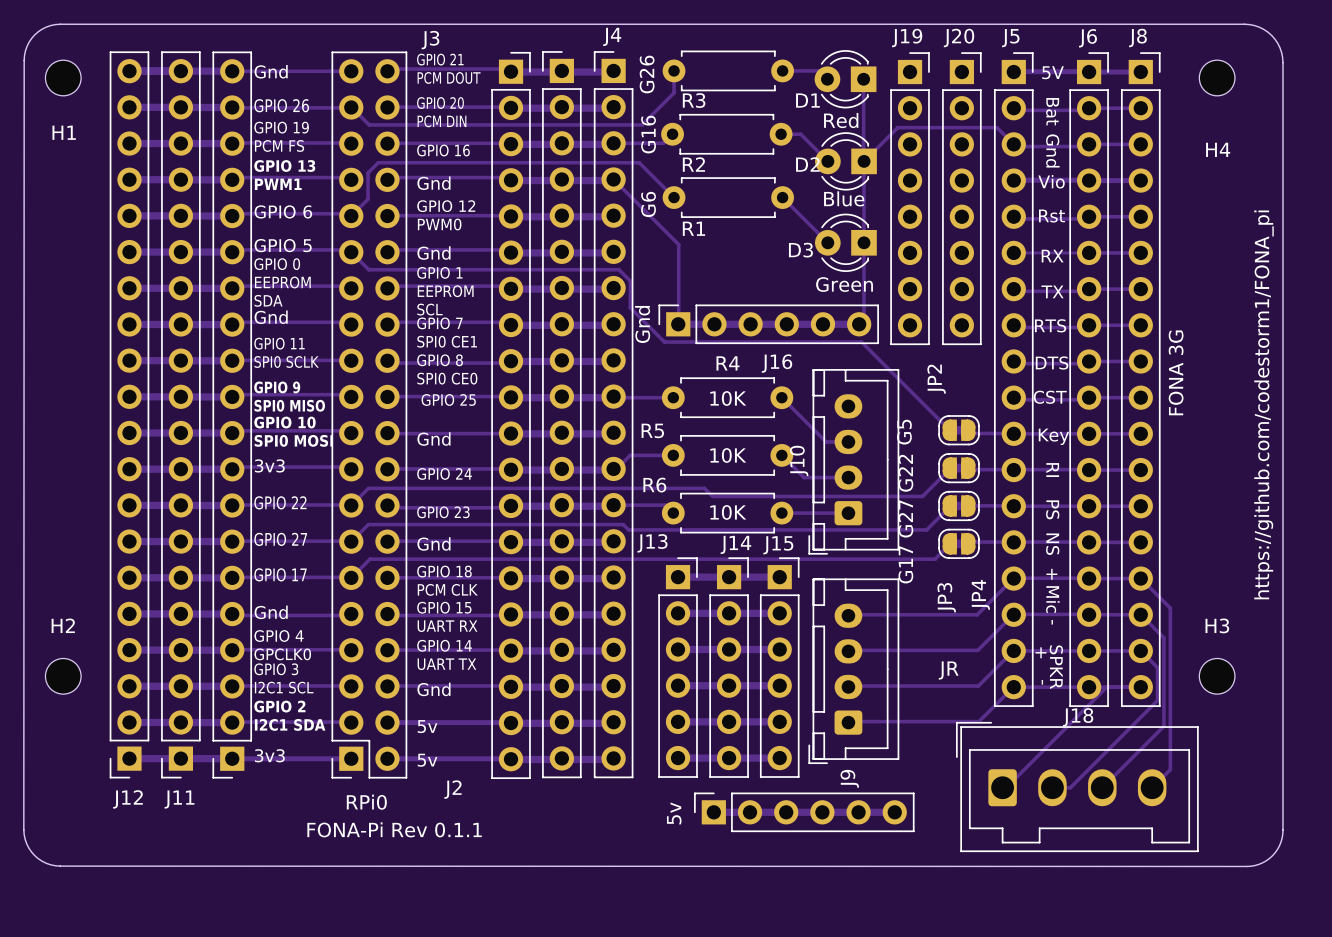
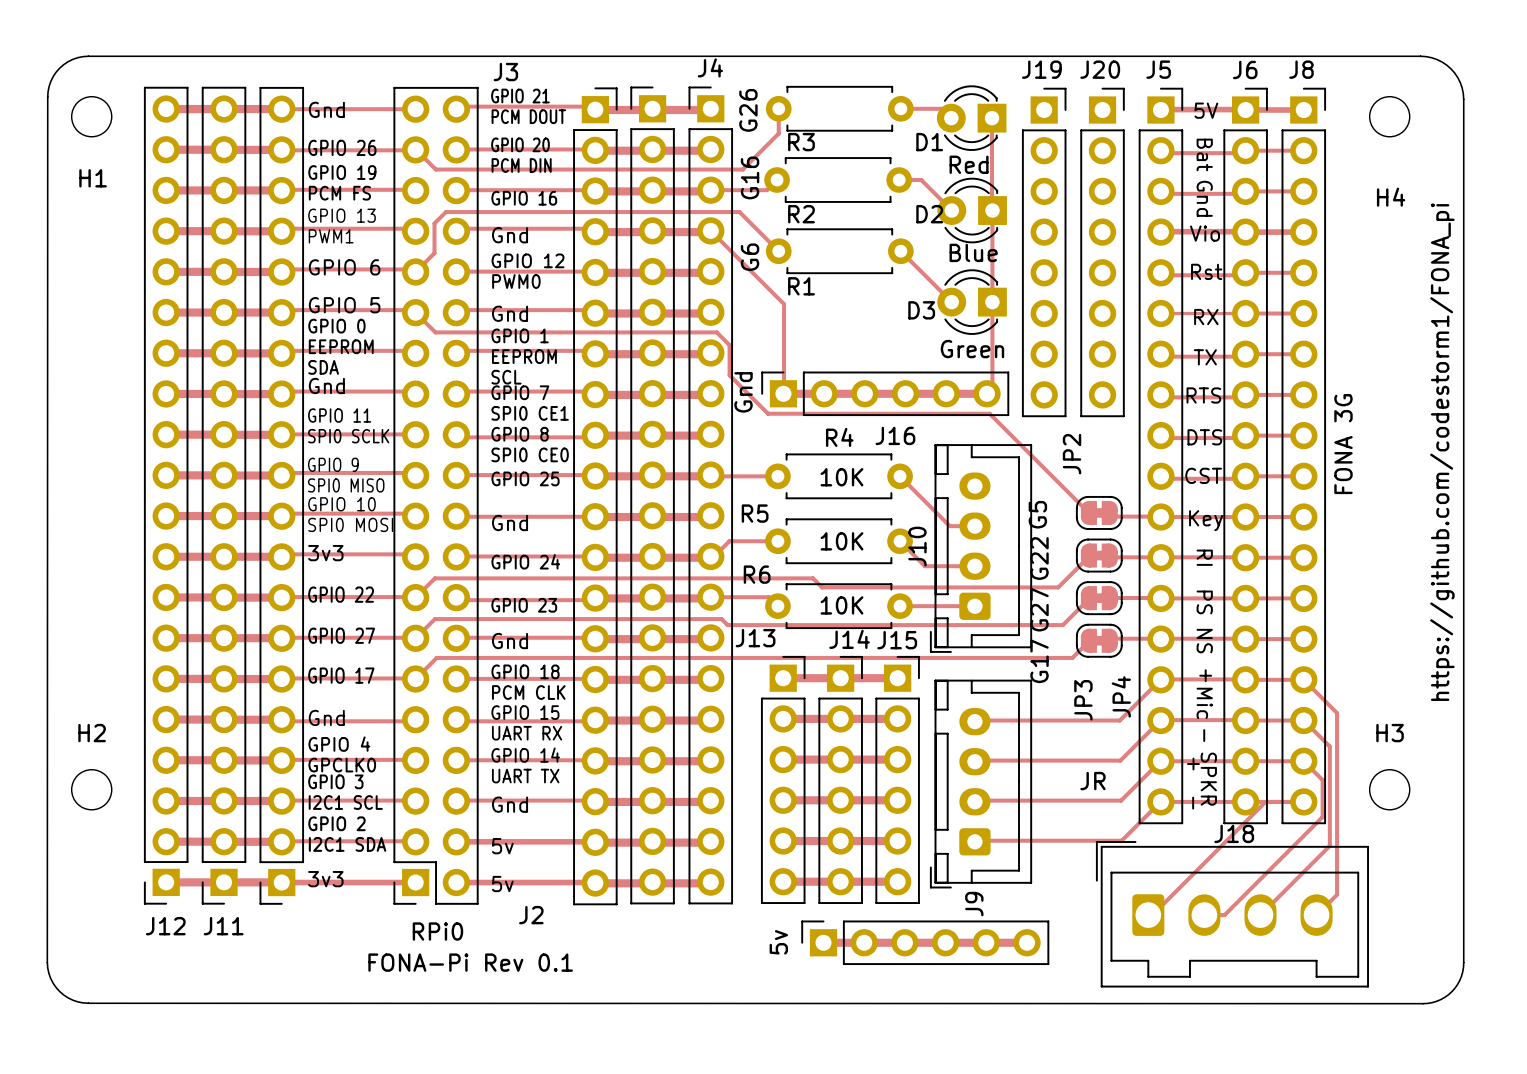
track: (1013, 144) (997, 127) (897, 127) (864, 161) -> none
text: FONA-Pi Rev 0.1.1 (394, 829) -> FONA-Pi Rev 0.1 (470, 962)

